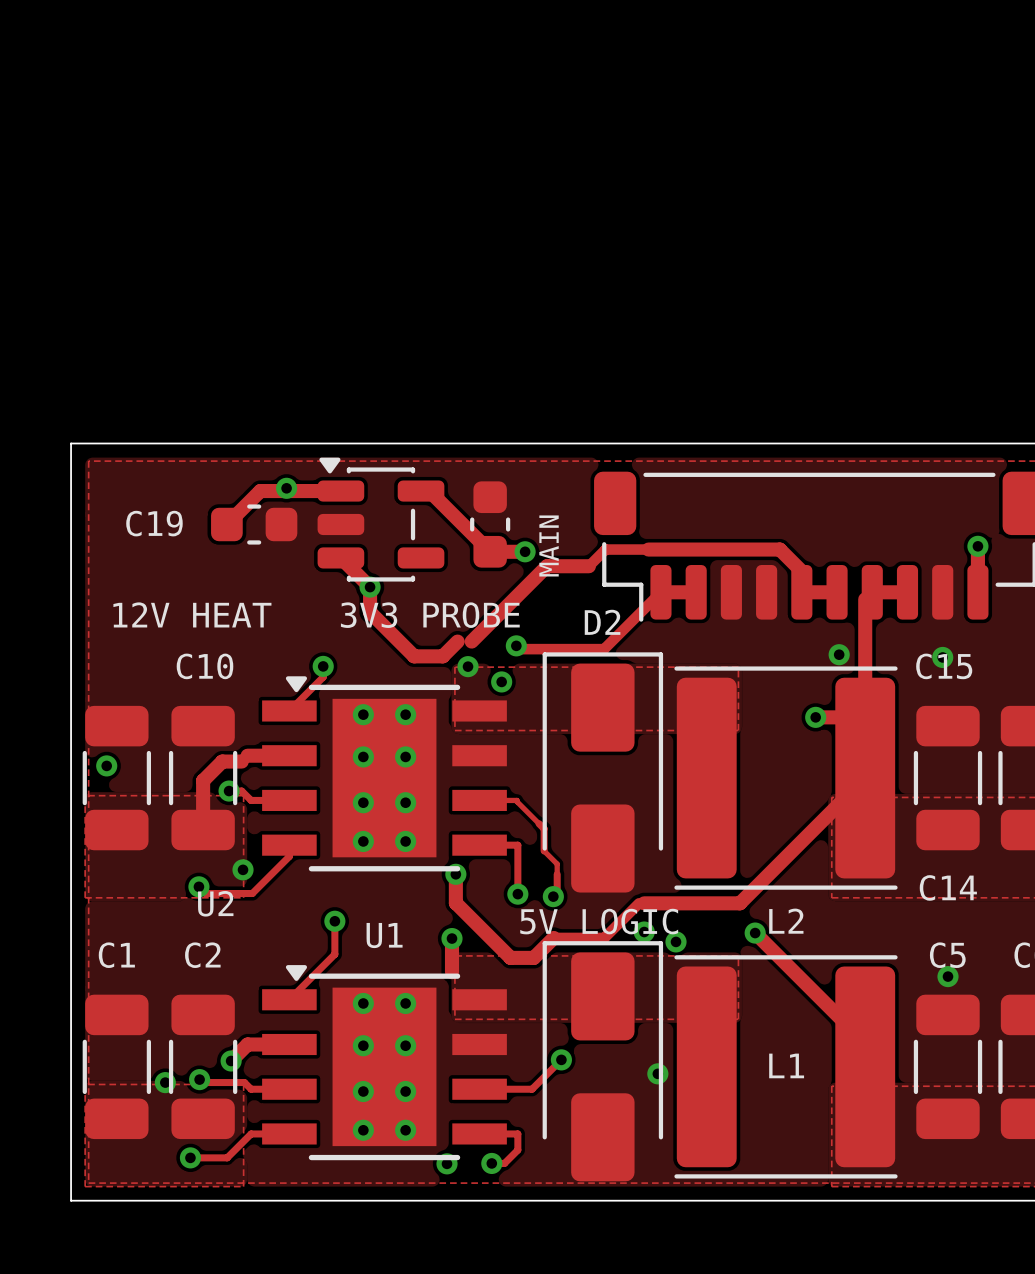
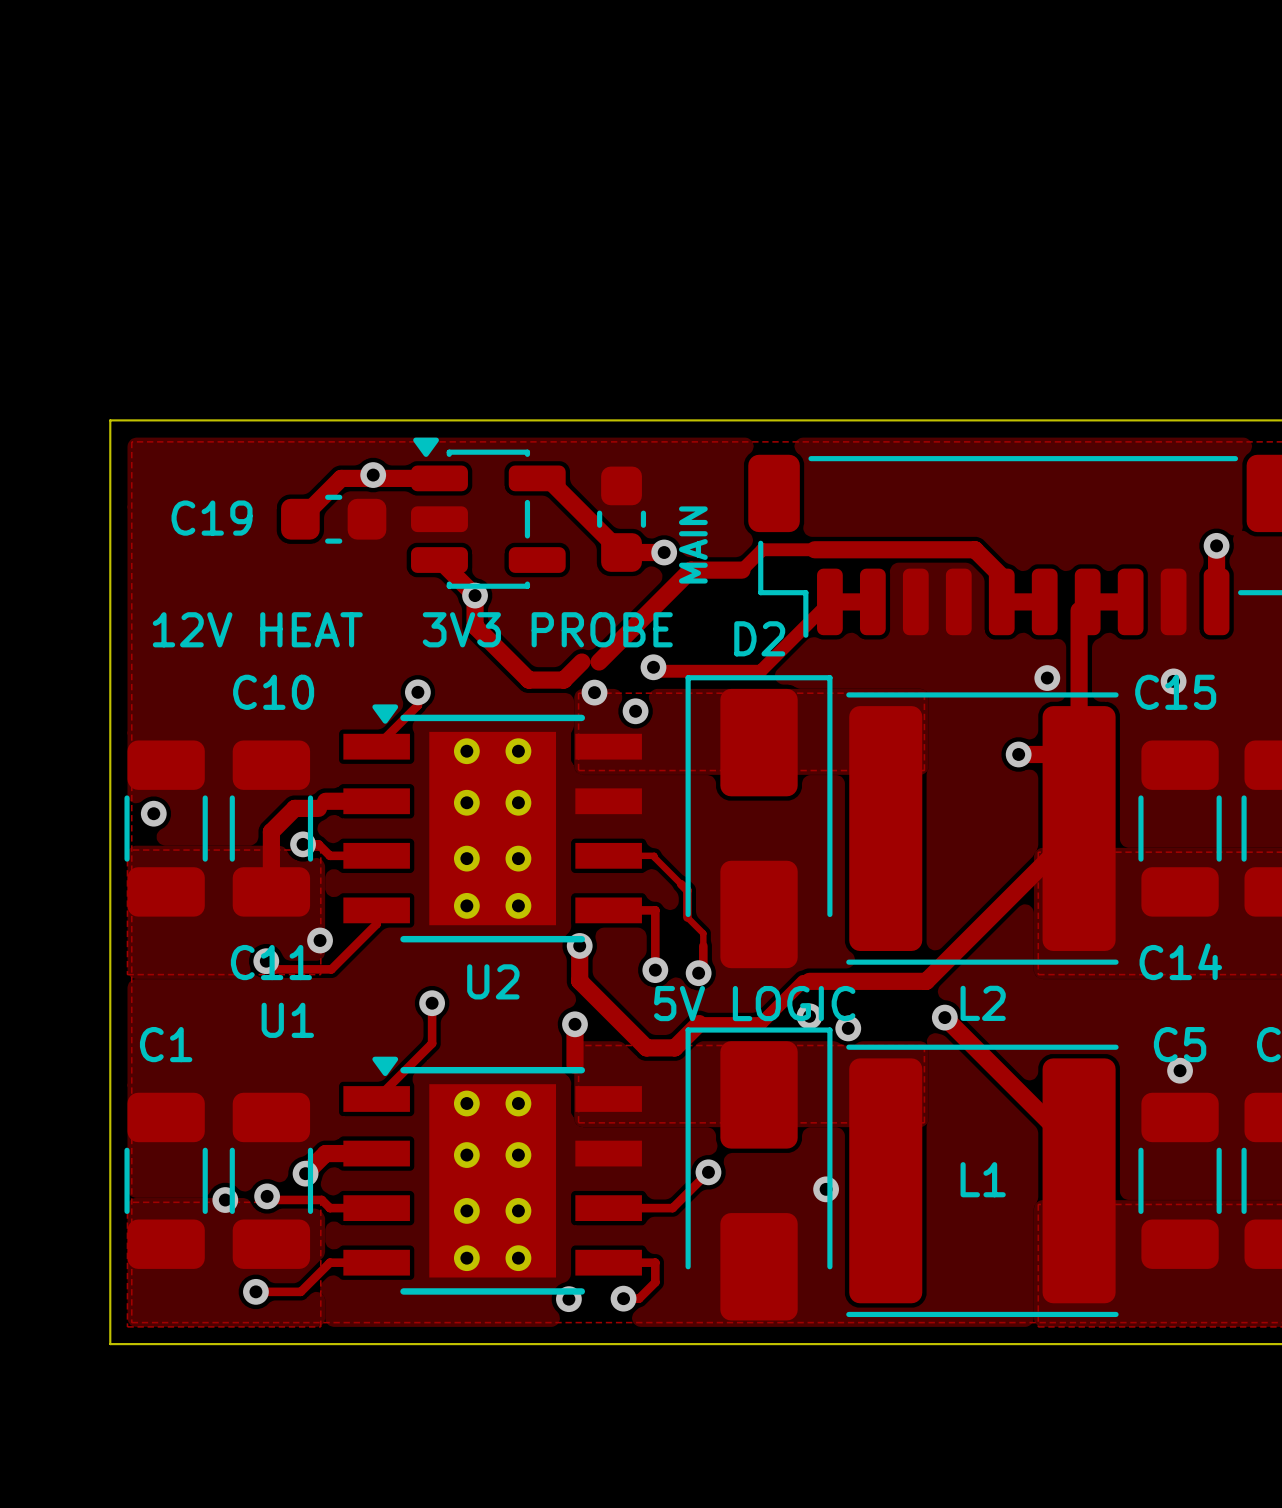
C11 name: none -> C11 (271, 962)
U2 name position: U2 (215, 903) -> U2 (493, 981)
U1 name position: U1 (384, 935) -> U1 (287, 1020)
C2 name: C2 (202, 955) -> none

